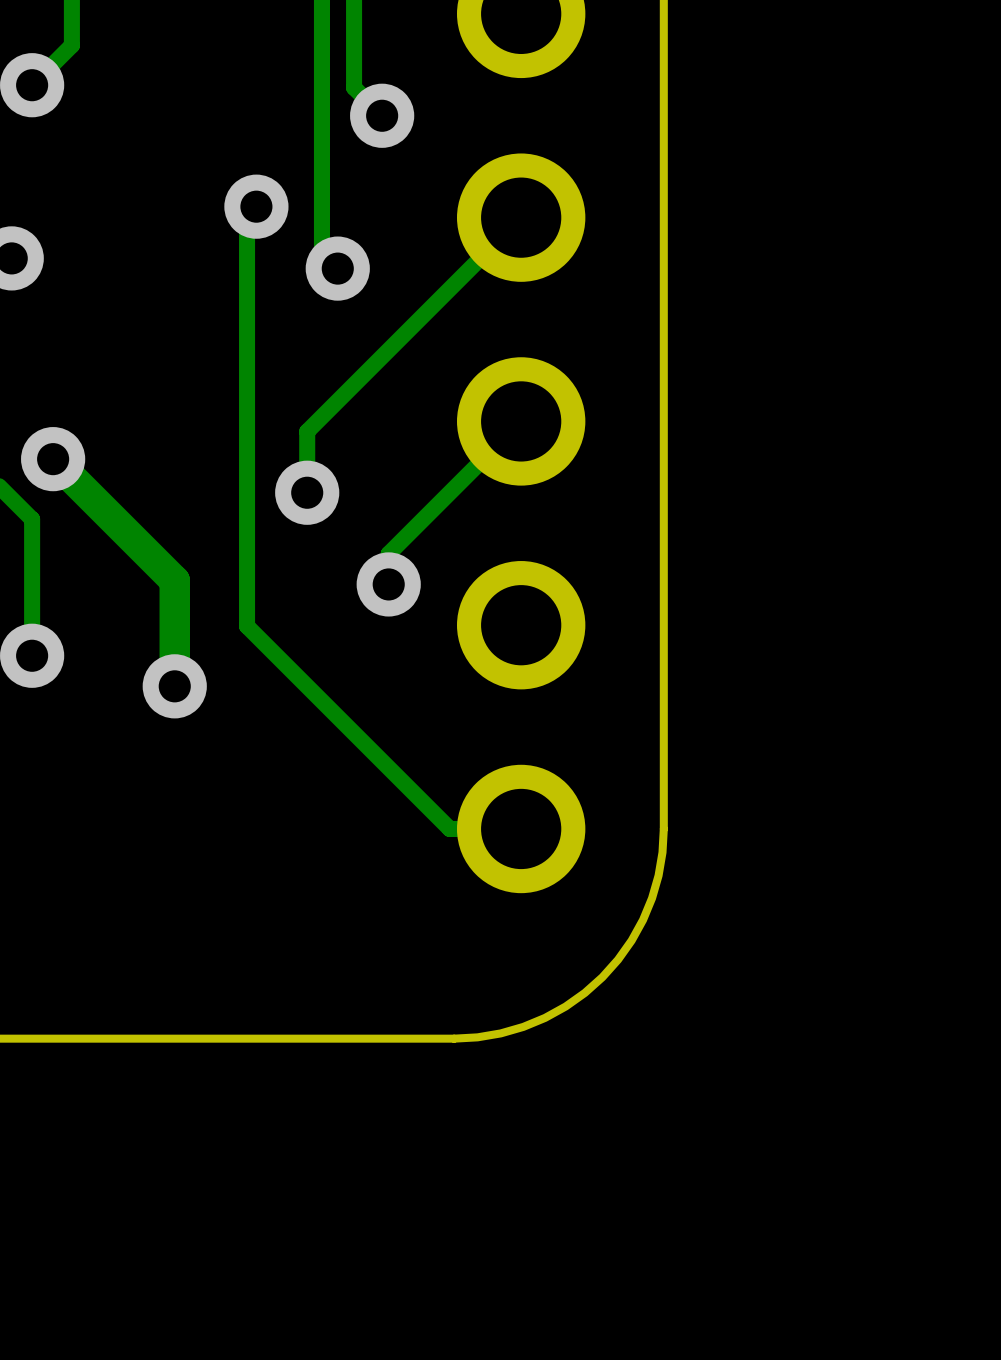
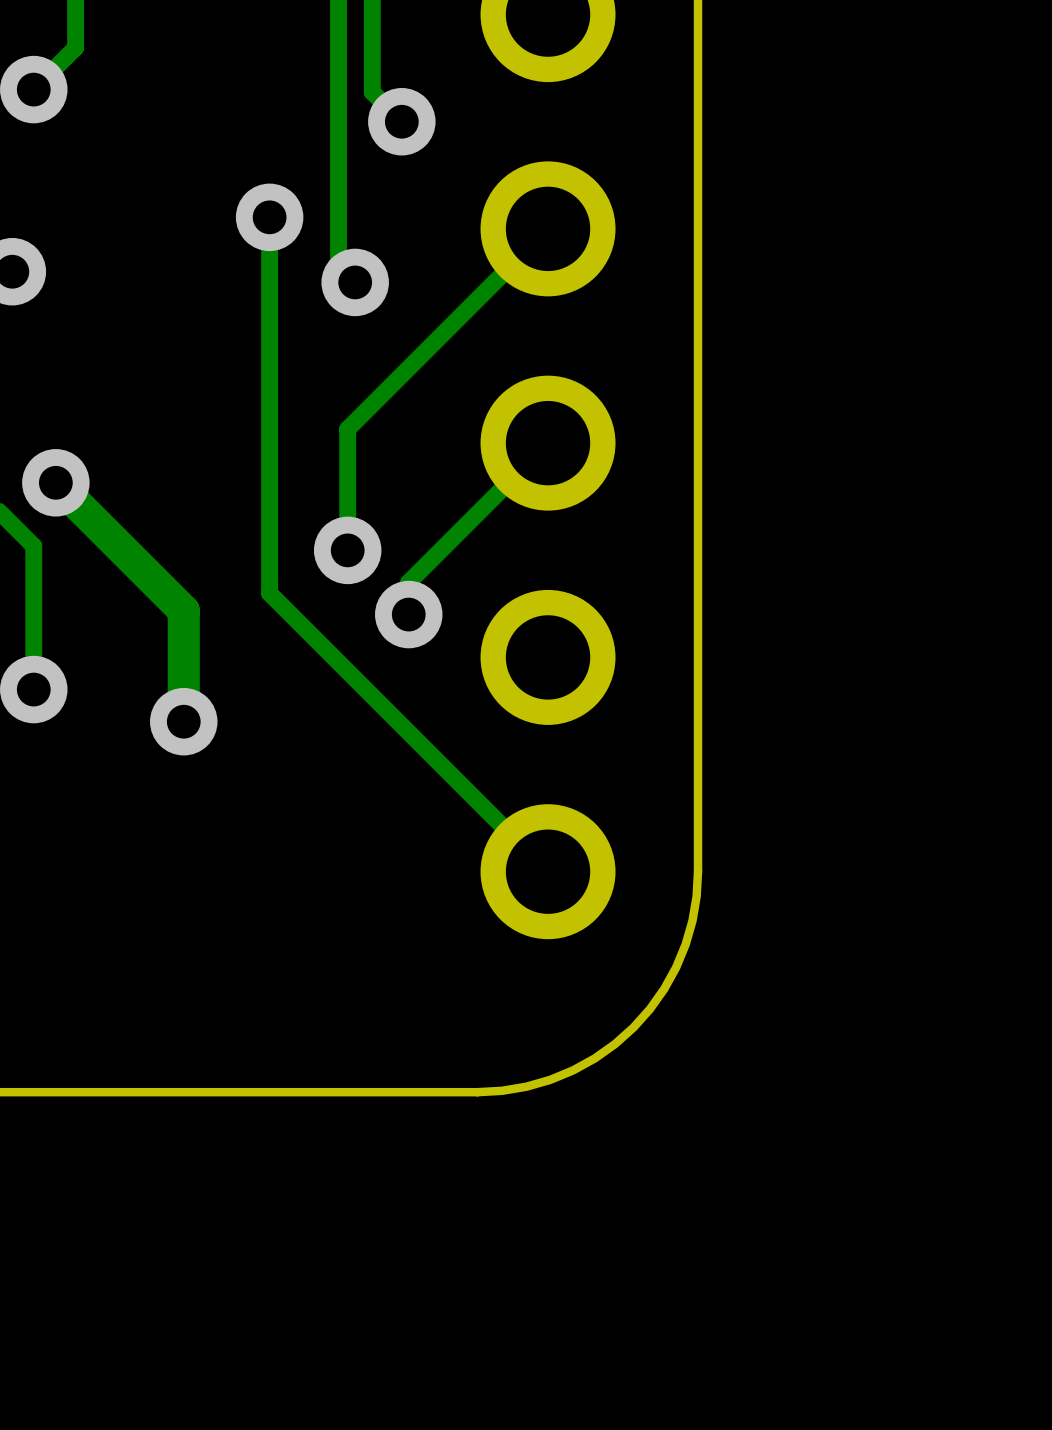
track: (256, 206) (247, 216) (247, 626) (449, 828) (521, 828) -> (269, 217) (269, 593) (548, 871)
track: (330, 408) (307, 431) (307, 492) -> (347, 429) (347, 550)
via position: (307, 492) -> (347, 550)

